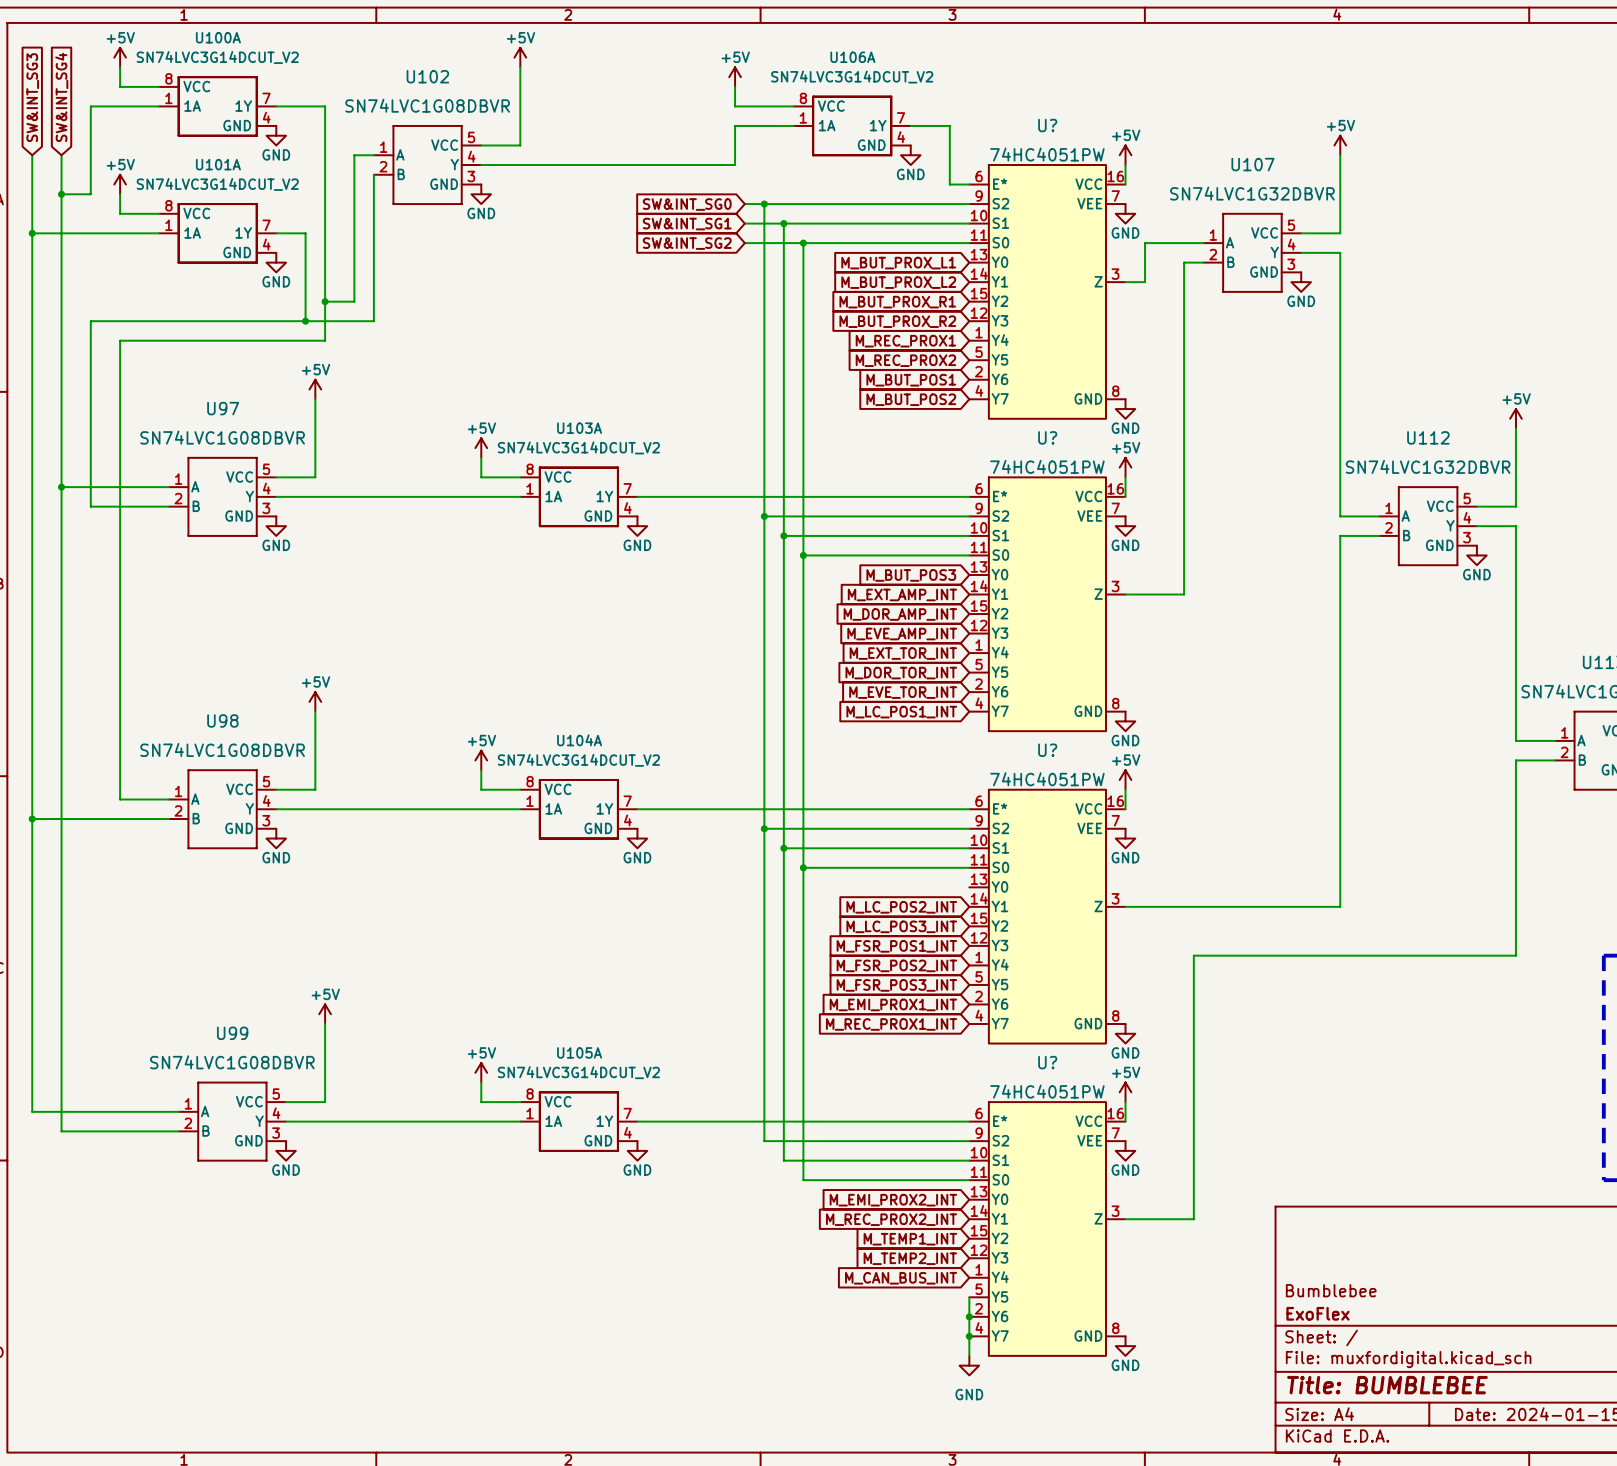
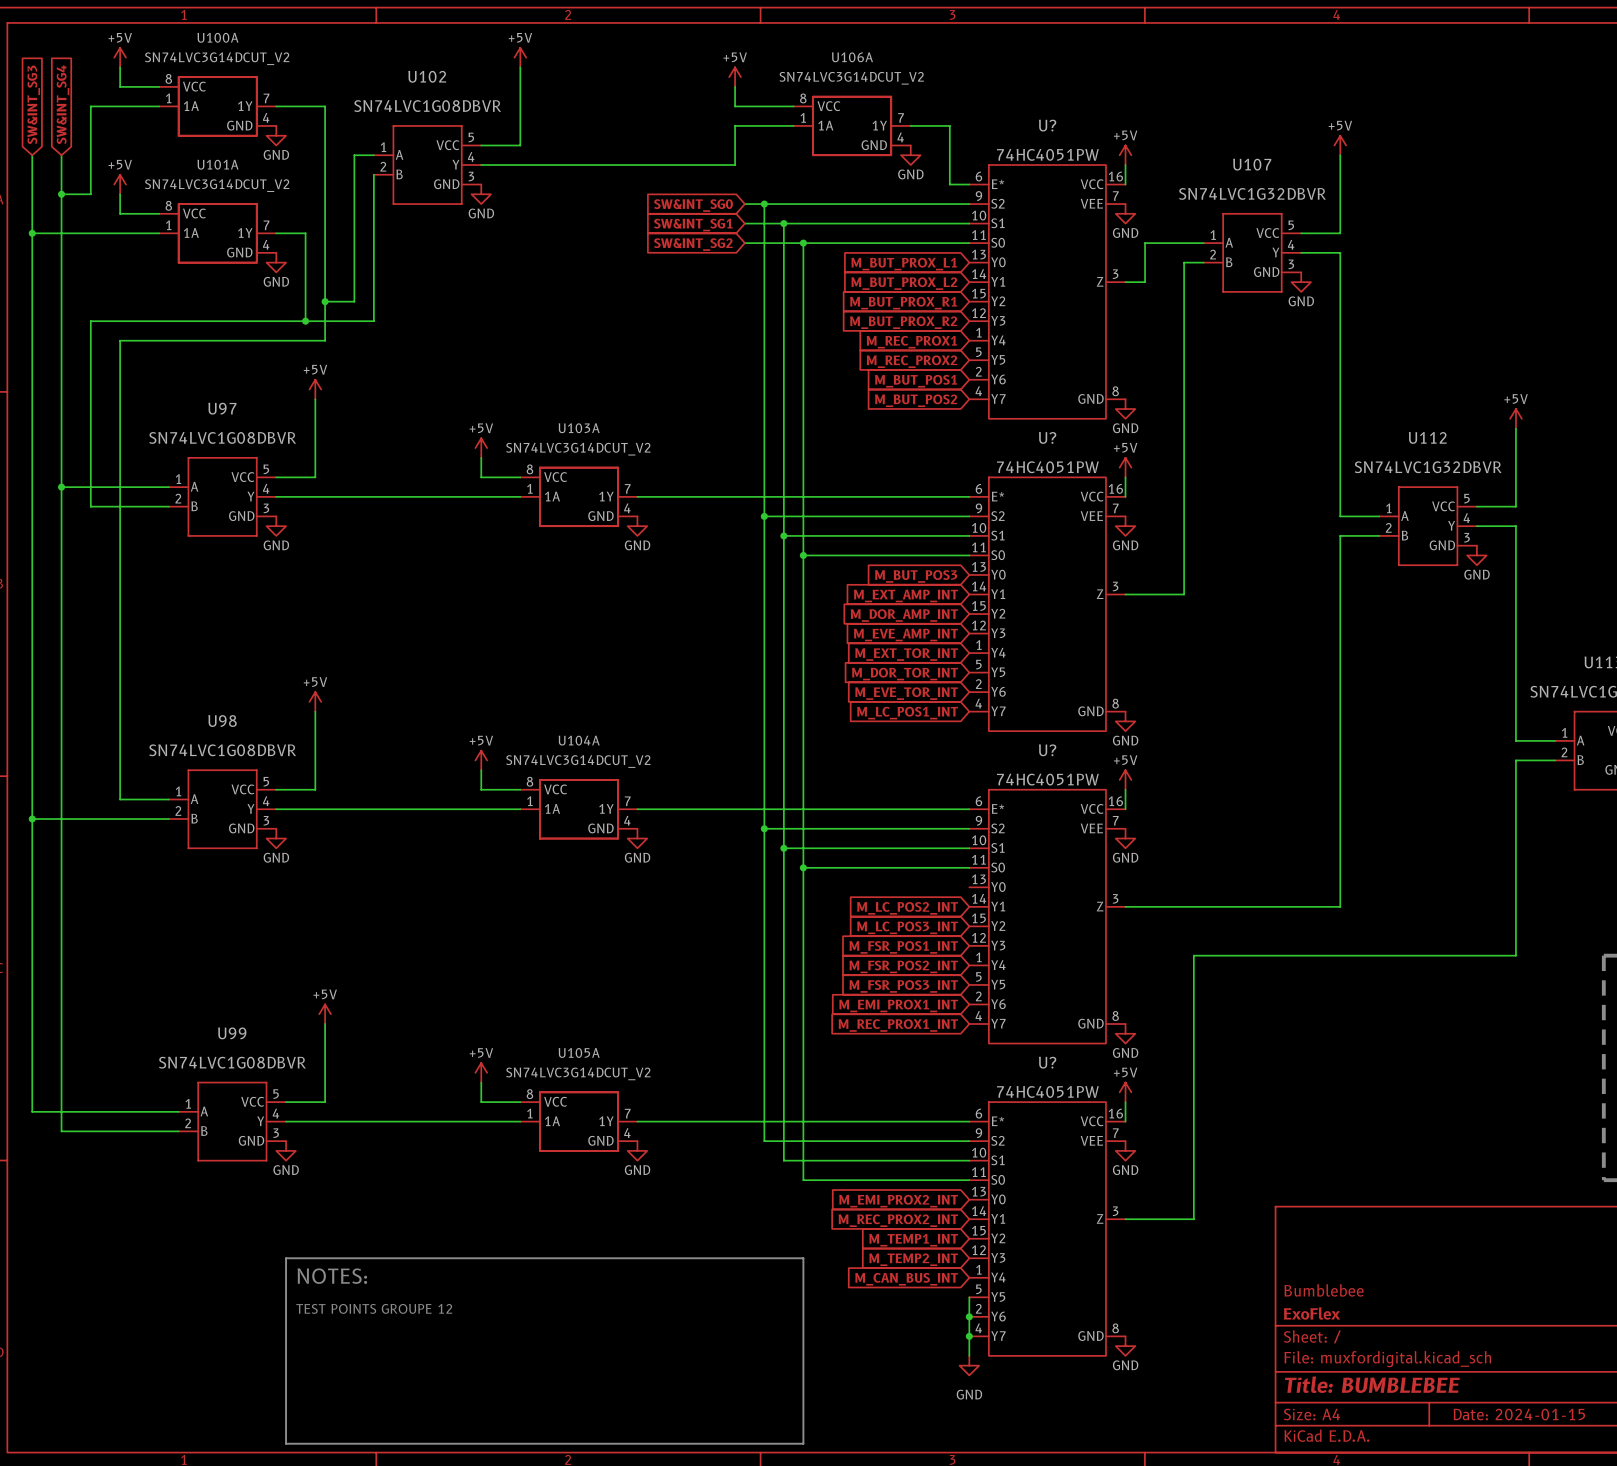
line: none -> (286, 1258) (286, 1443) (803, 1443) (803, 1258) (286, 1258)
text: none -> NOTES: (332, 1276)
text: none -> TEST POINTS GROUPE 12 (374, 1308)

